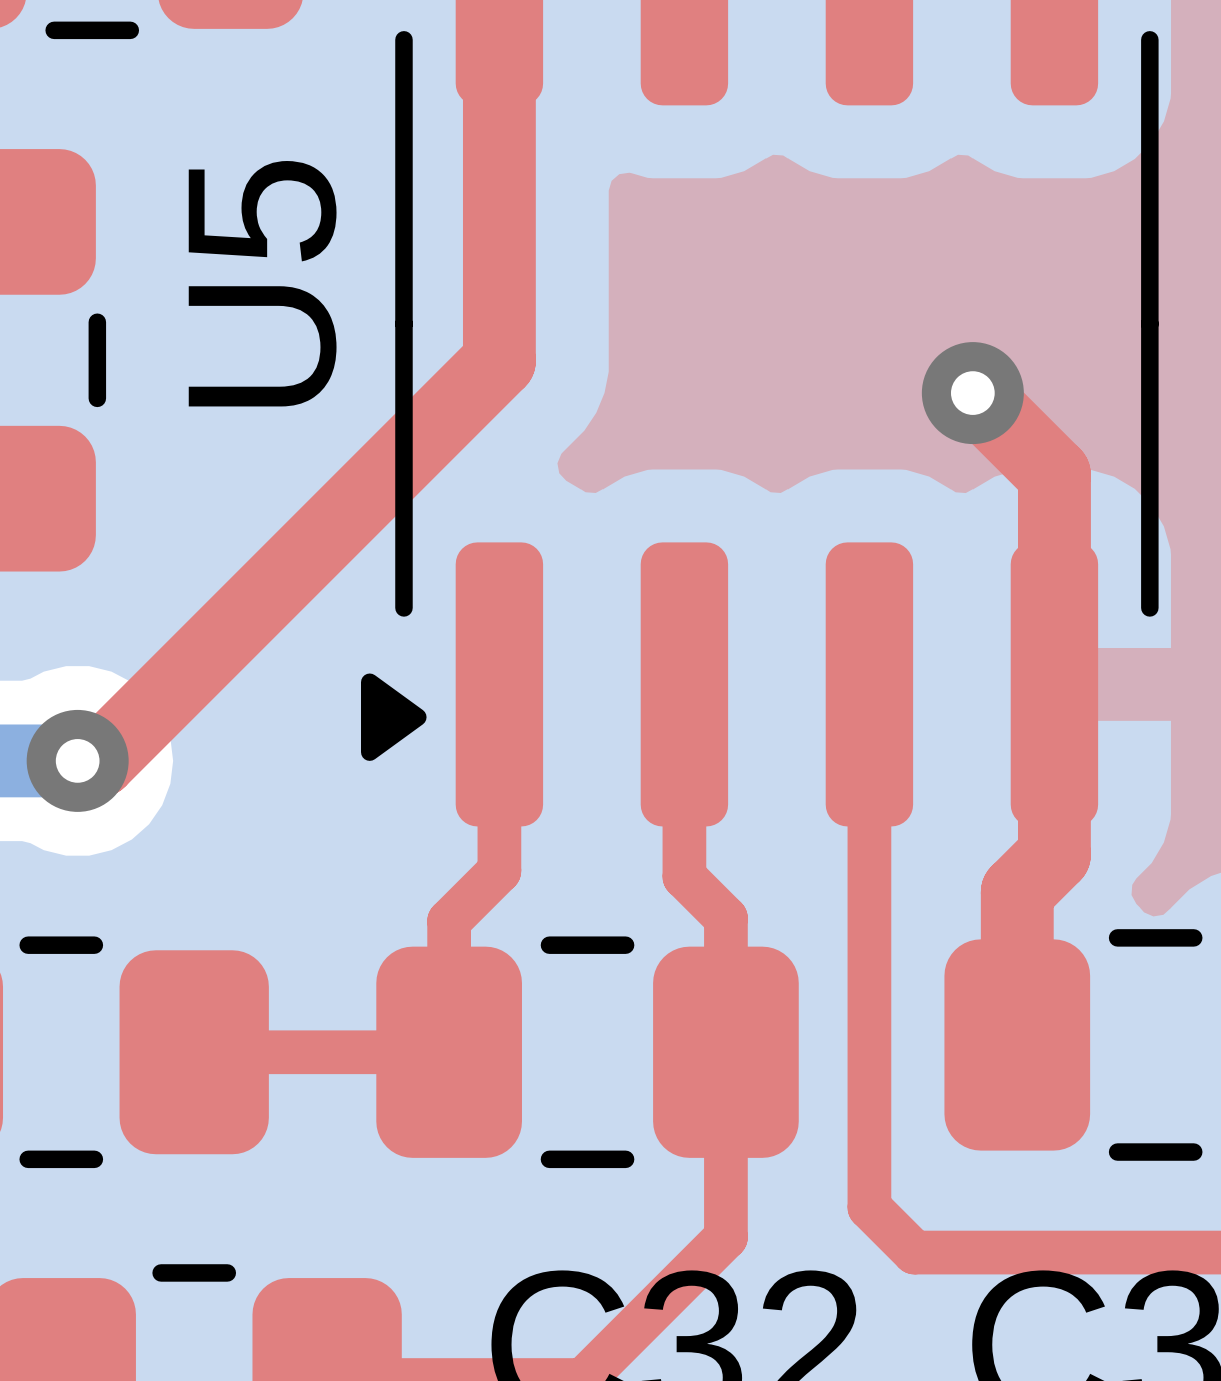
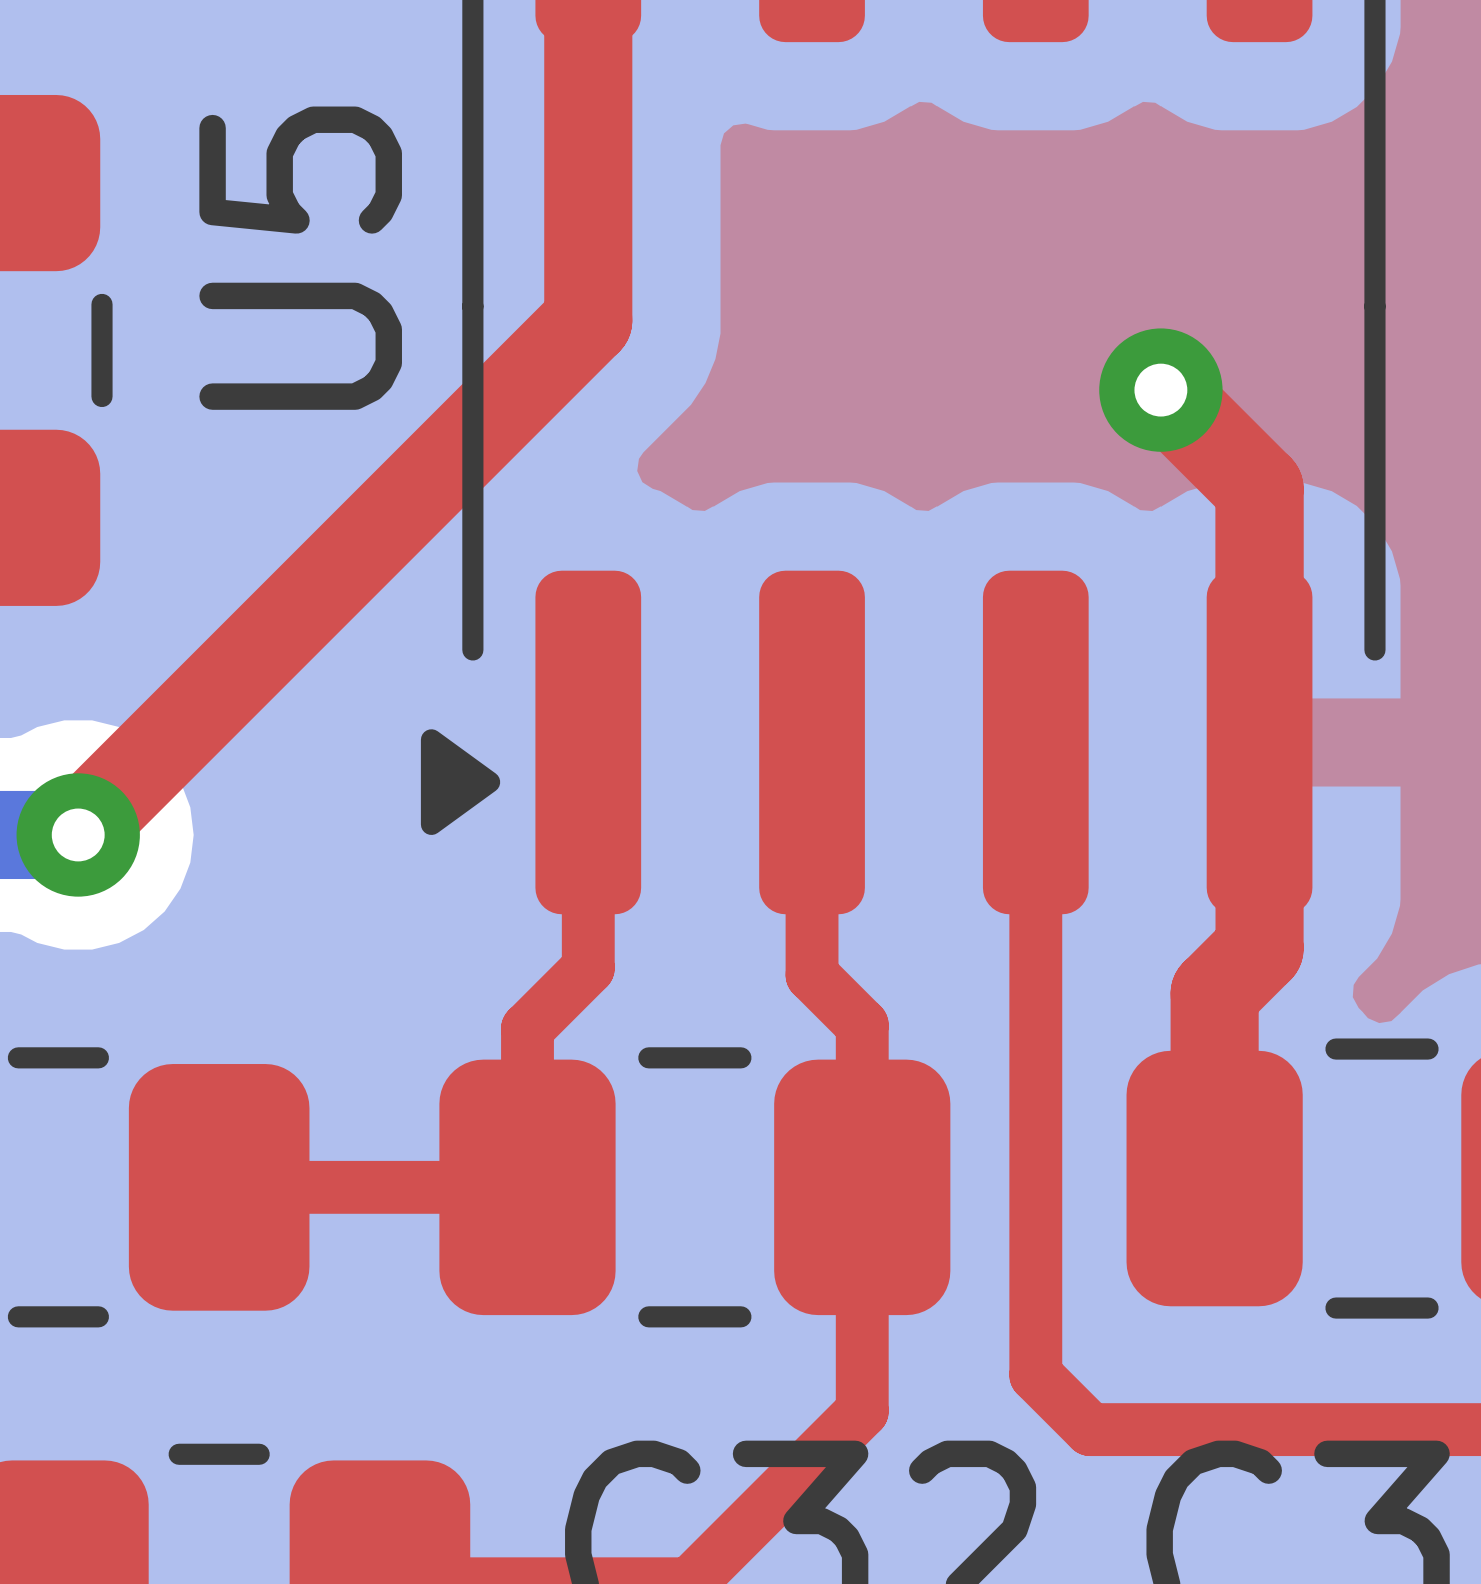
top track: (499, 335) (499, 361) (99, 760) (77, 760) -> (588, 320) (78, 830) (78, 834)

